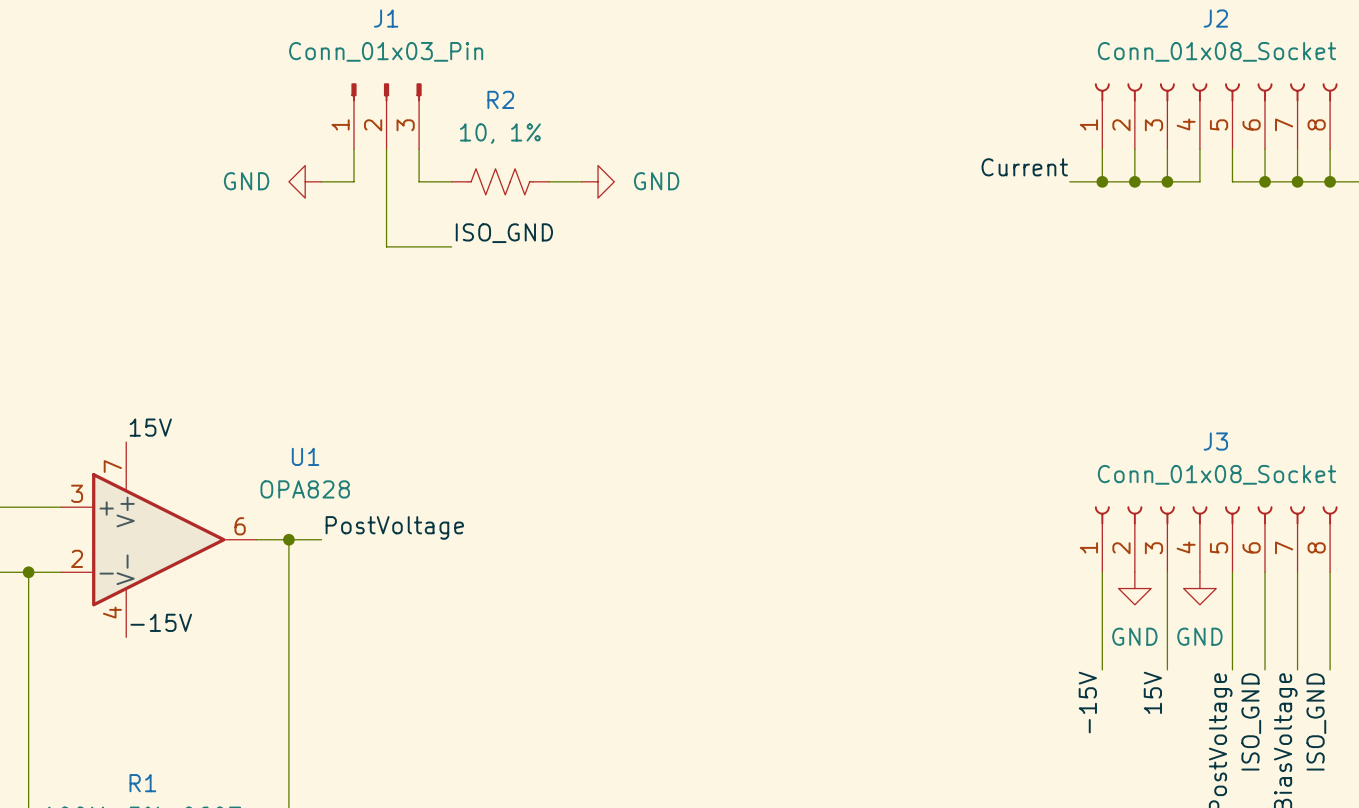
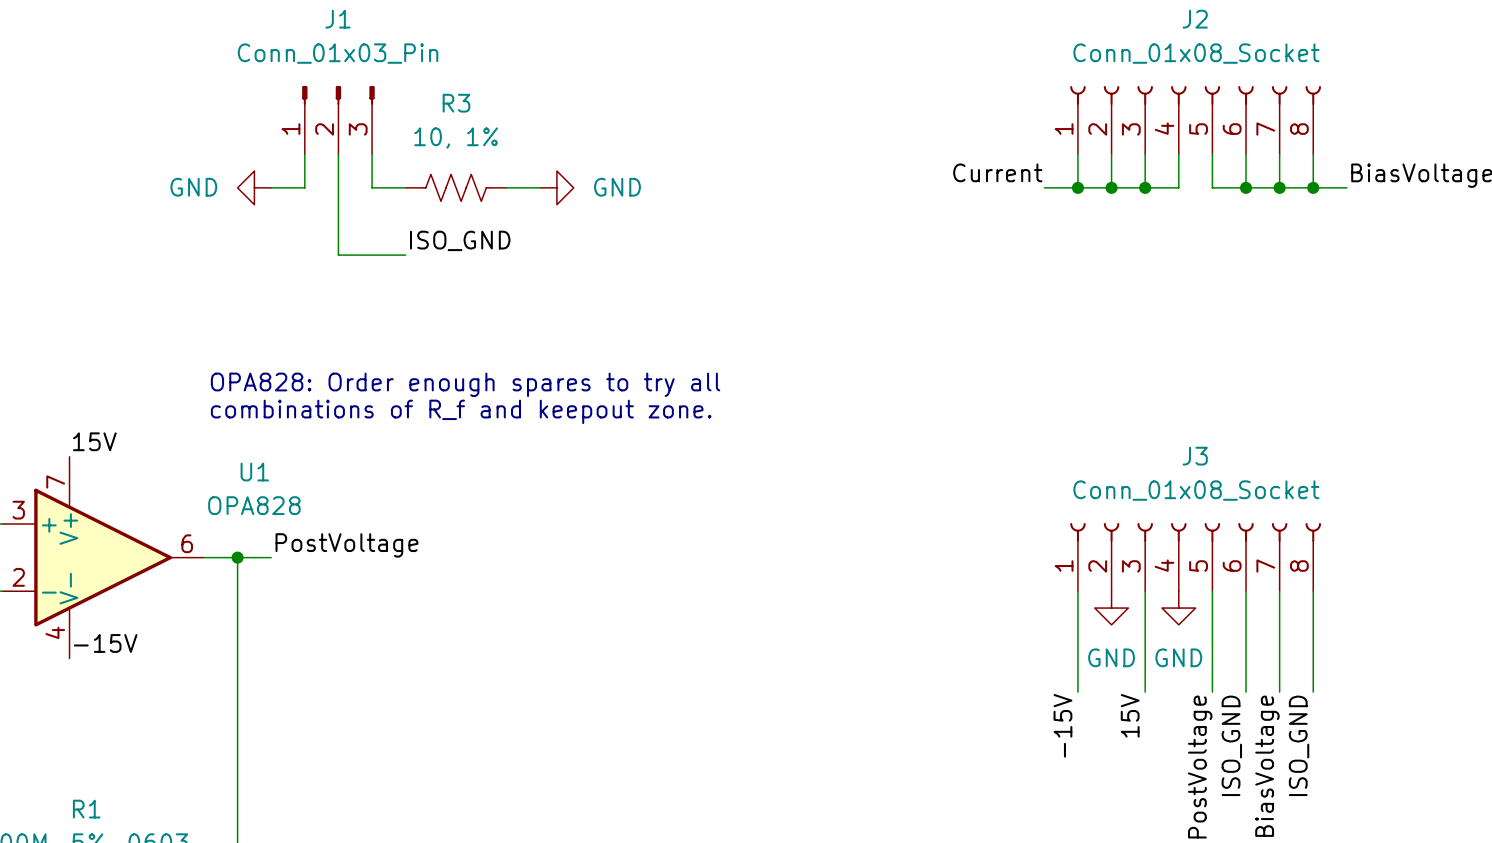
R2 name: R2 (500, 99) -> R3 (456, 103)
text: none -> OPA828: Order enough spares to try all (465, 384)
text: none -> combinations of R_f and keepout zone. (461, 411)

